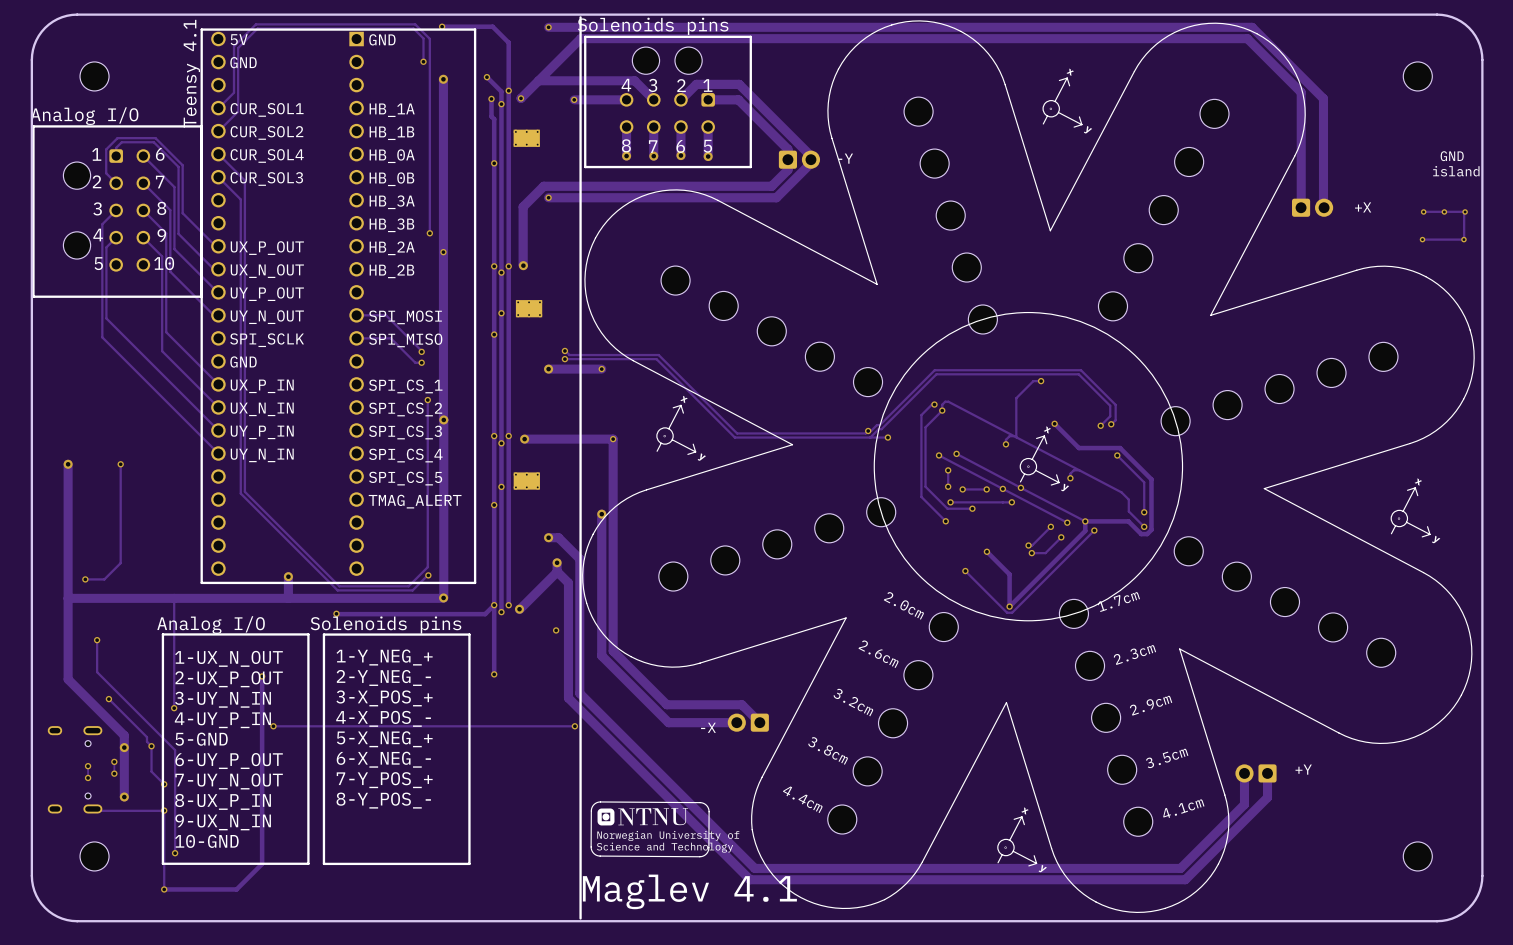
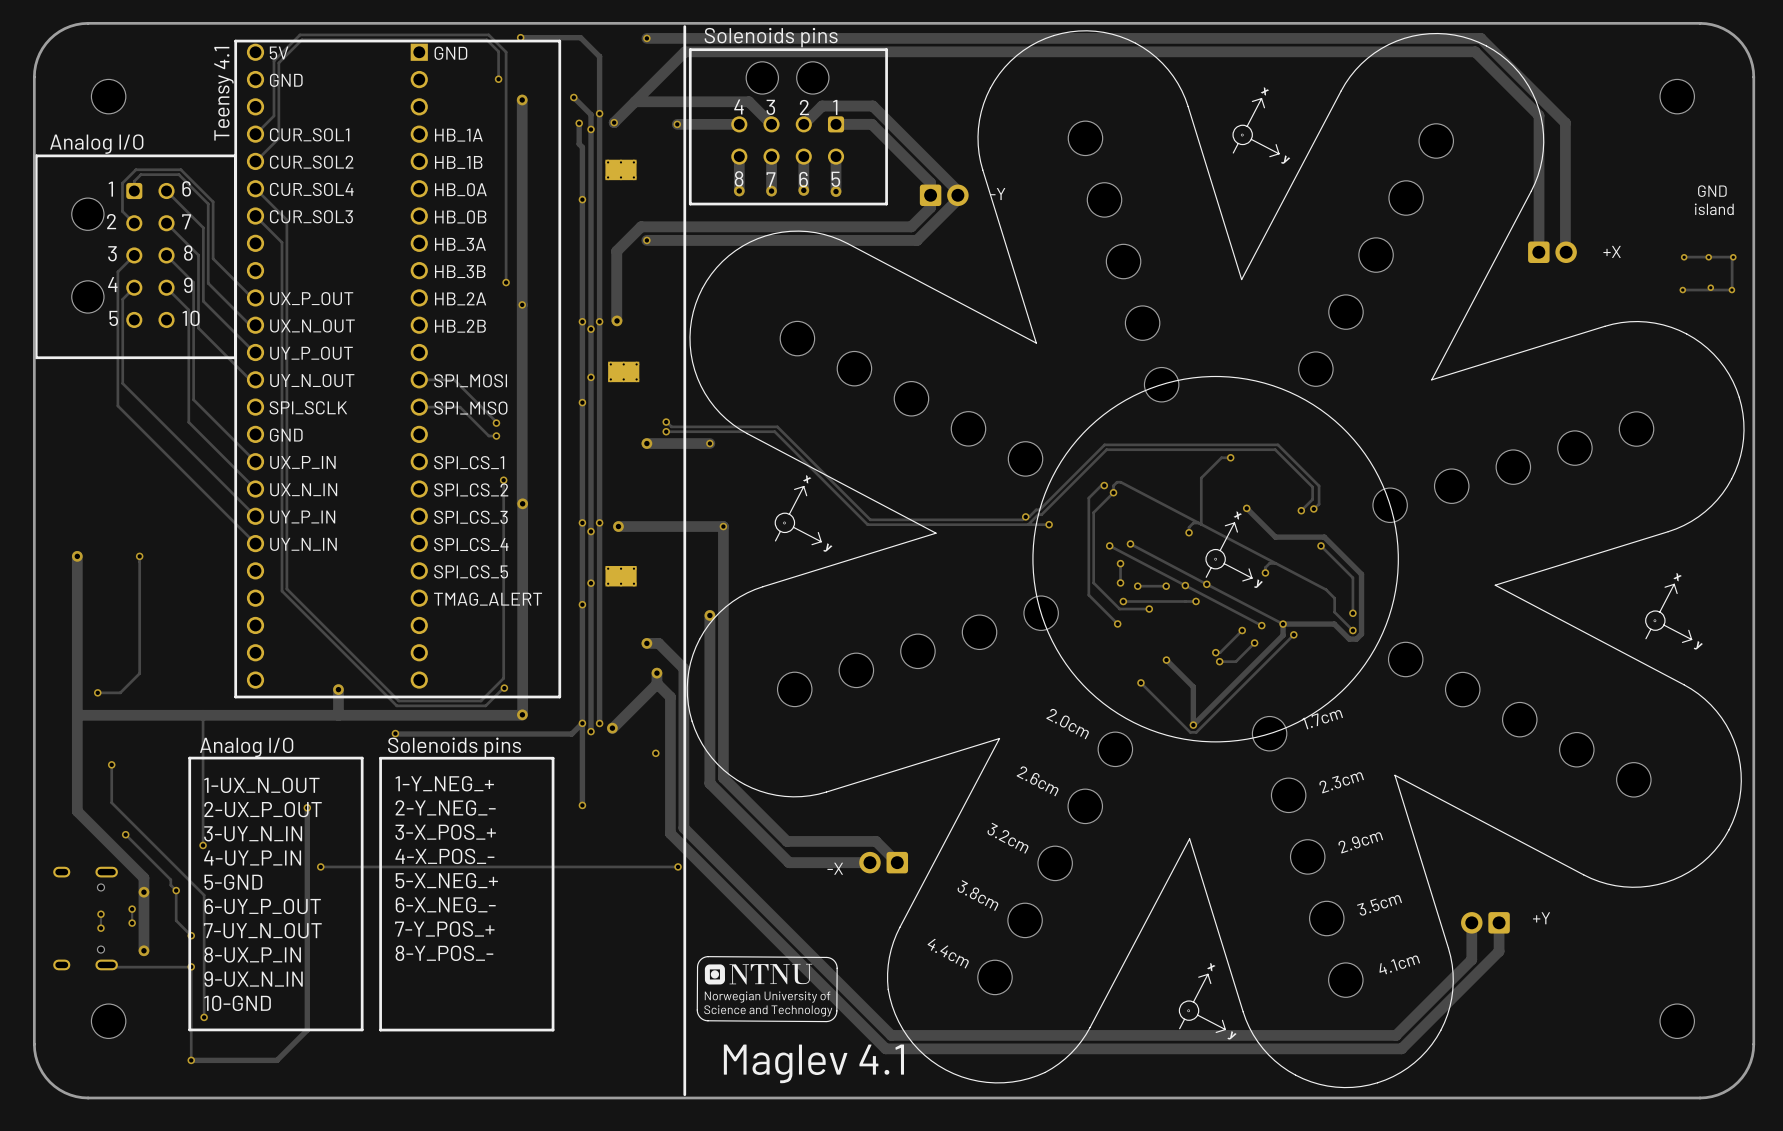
via: none -> (1710, 287)

